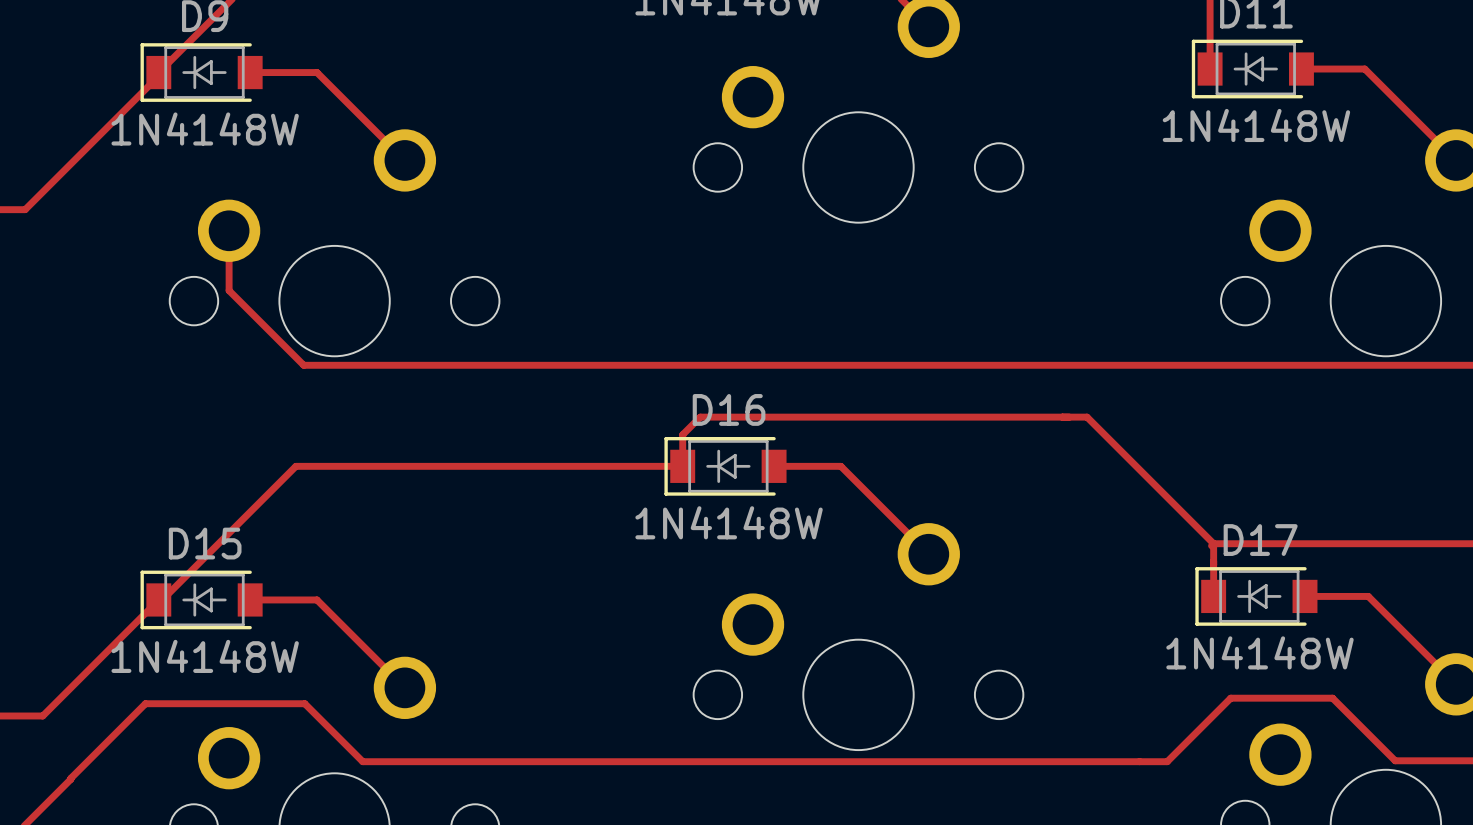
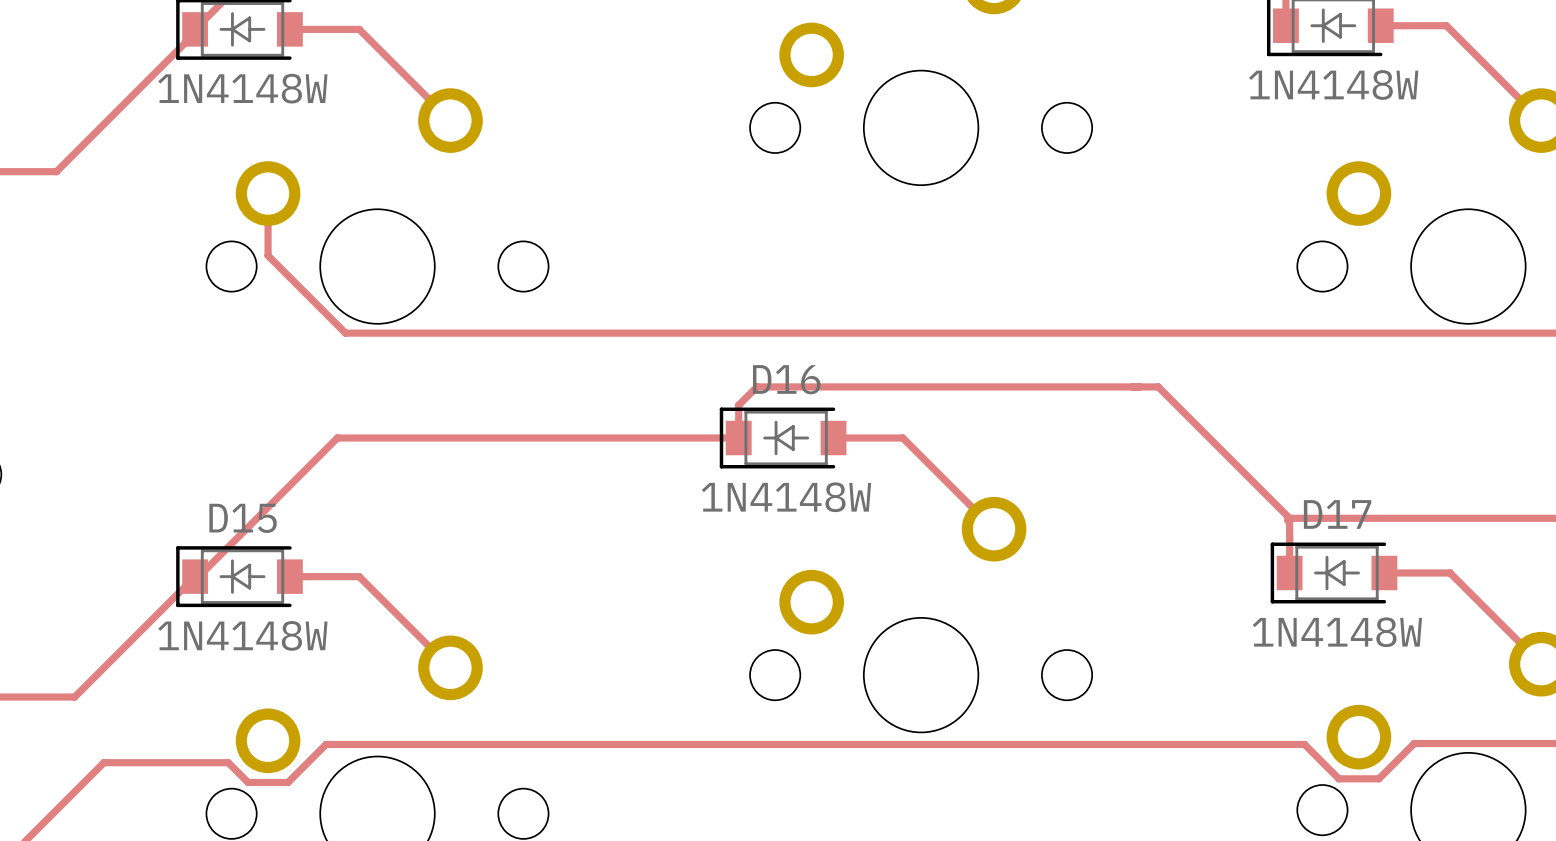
track: (1395, 760) (1332, 698) (1230, 698) (1167, 761) -> (1478, 743) (1414, 743) (1378, 778) (1338, 778) (1304, 744) (1241, 744)
track: (362, 761) (304, 703) (145, 703) (70, 779) -> (406, 744) (326, 744) (288, 782) (248, 782) (228, 762) (103, 762)

